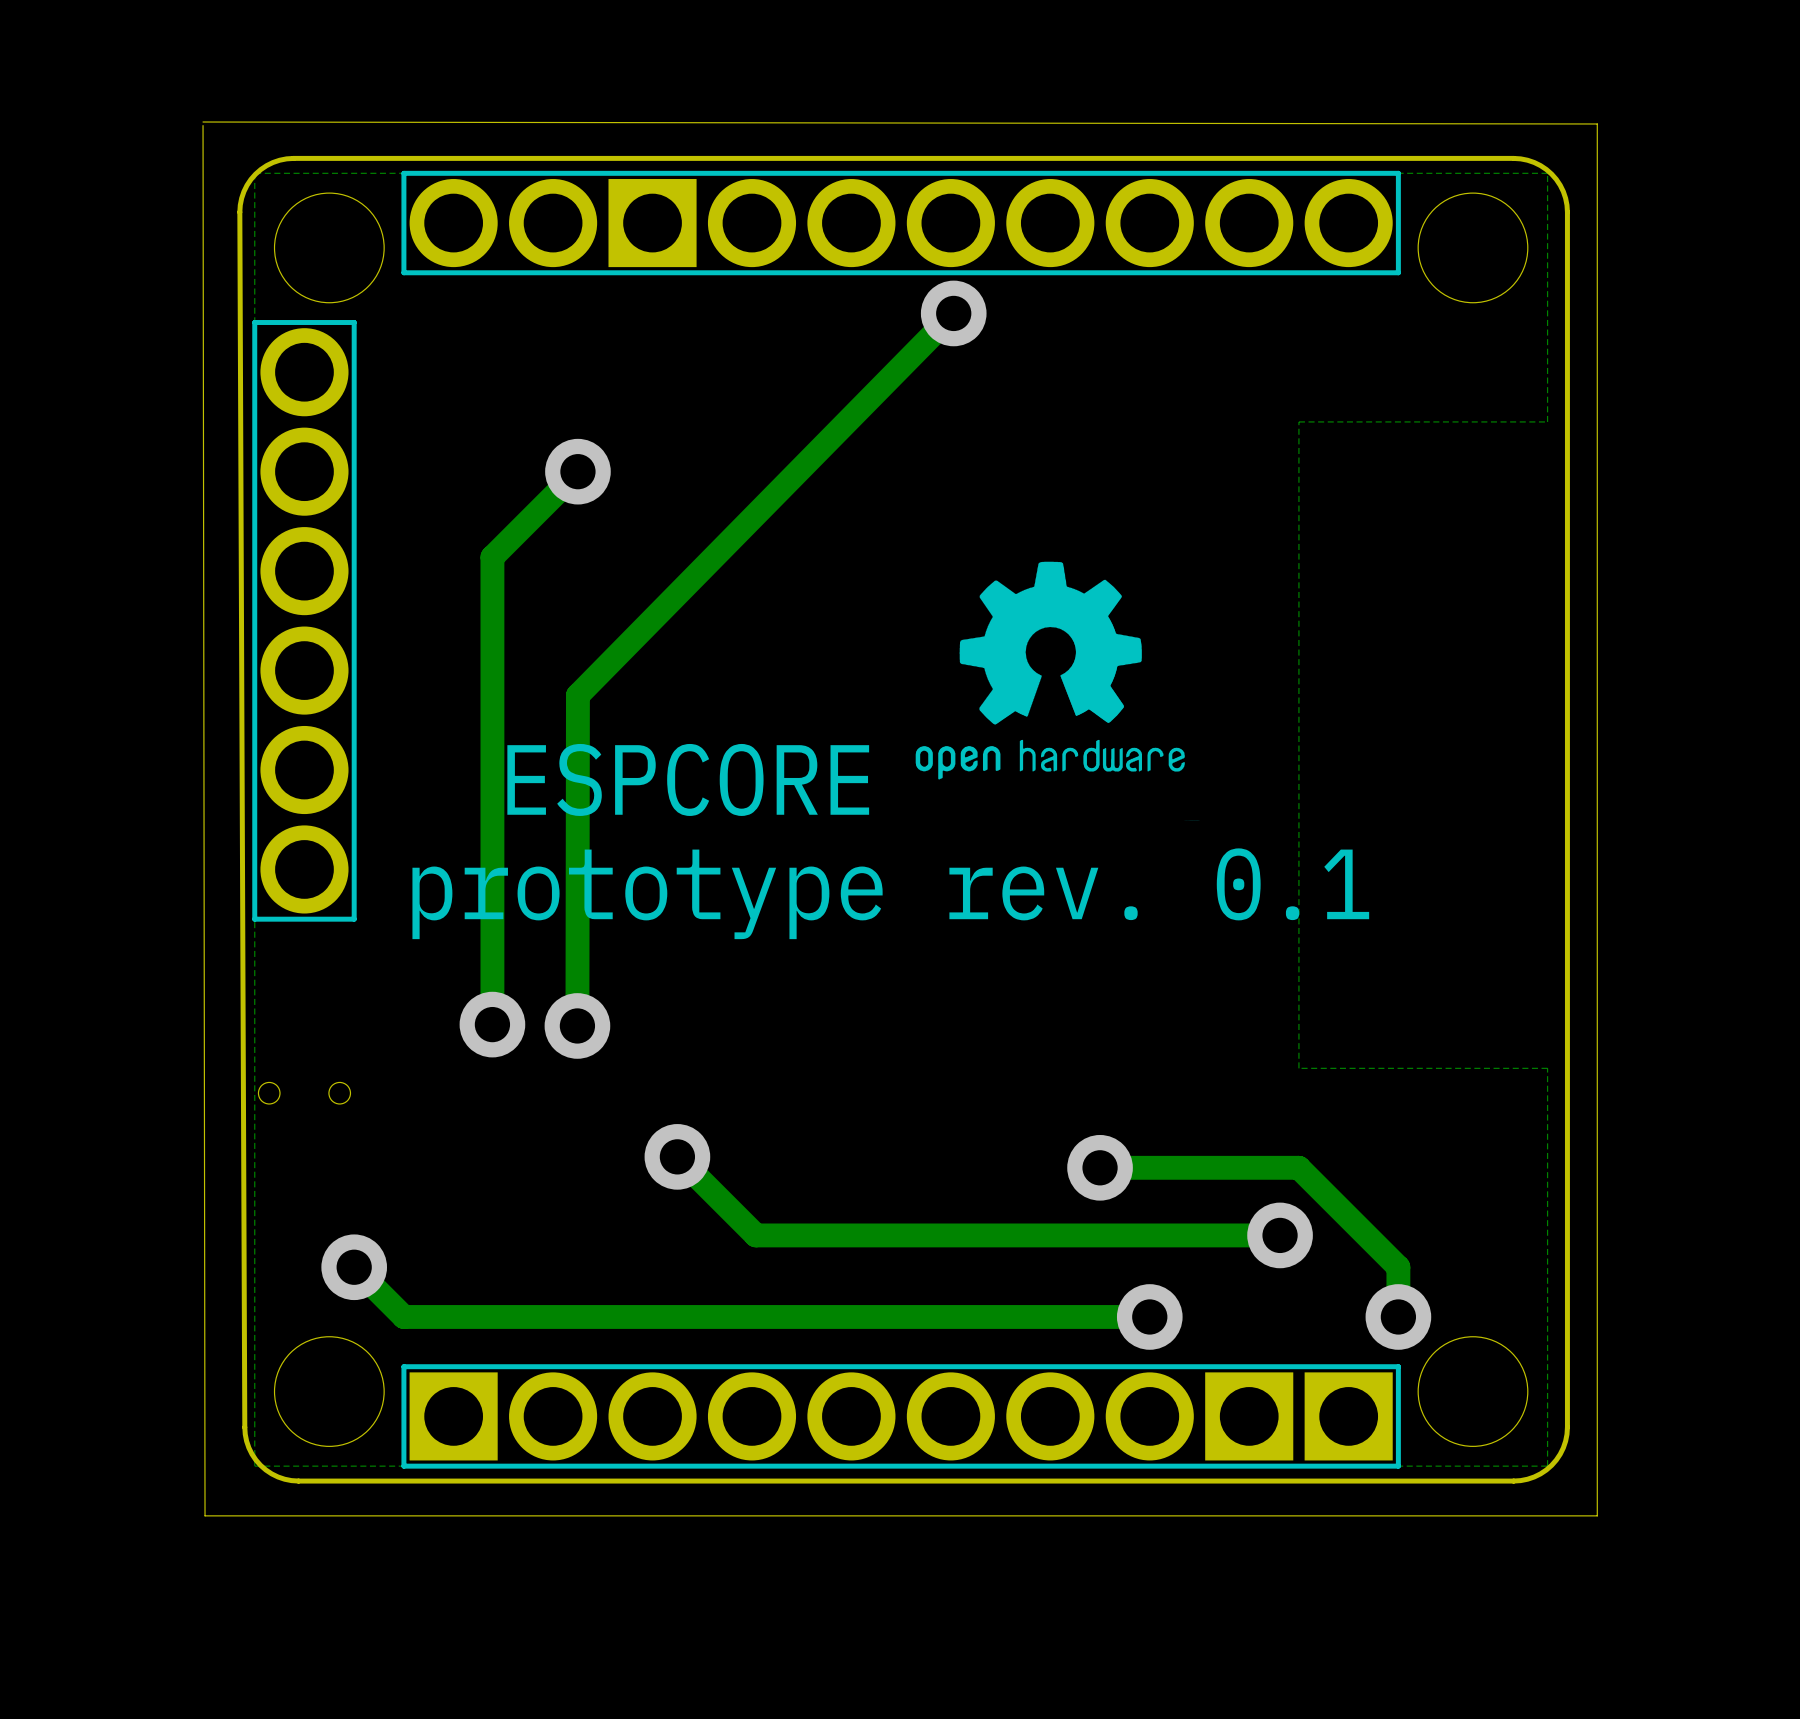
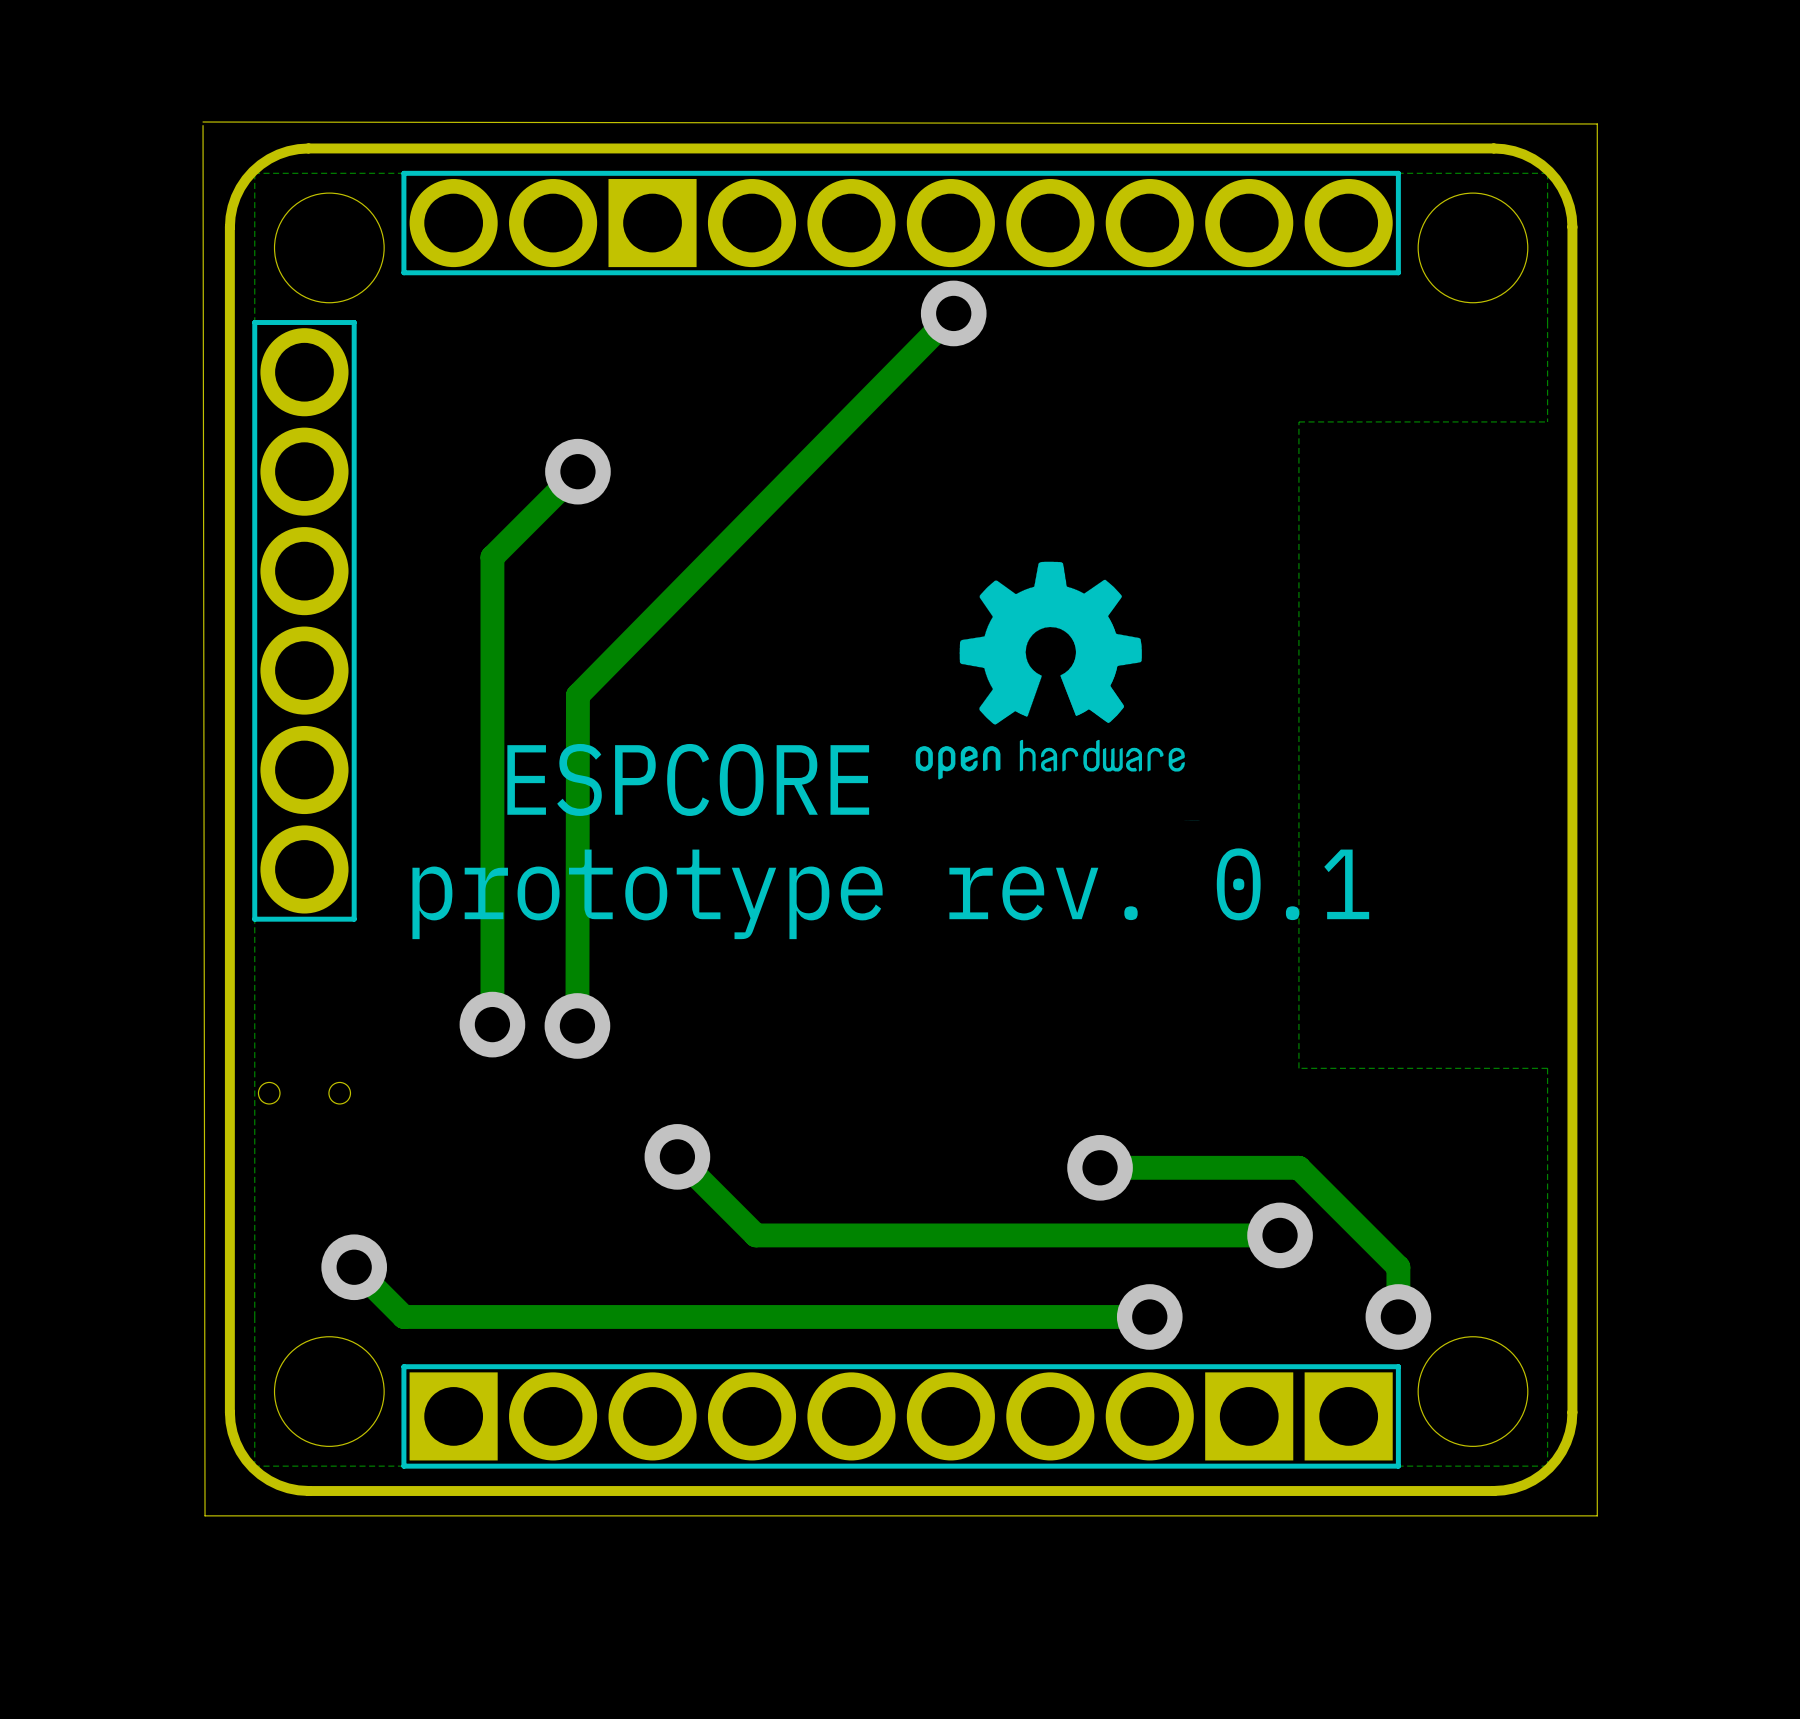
board edge: (1513, 158) (293, 158) (273, 162) (255, 174) (243, 191) (239, 212) (244, 1427) (248, 1447) (260, 1465) (277, 1476) (298, 1481) (1513, 1481) (1534, 1476) (1551, 1465) (1563, 1447) (1567, 1427) (1567, 212) (1563, 191) (1551, 174) (1534, 162) (1513, 158) -> (1493, 148) (1523, 154) (1549, 171) (1566, 197) (1572, 227) (1572, 1412) (1566, 1442) (1549, 1467) (1523, 1485) (1493, 1491) (308, 1491) (278, 1485) (252, 1467) (235, 1442) (229, 1412) (229, 227) (235, 197) (252, 171) (278, 154) (308, 148) (1493, 148)

